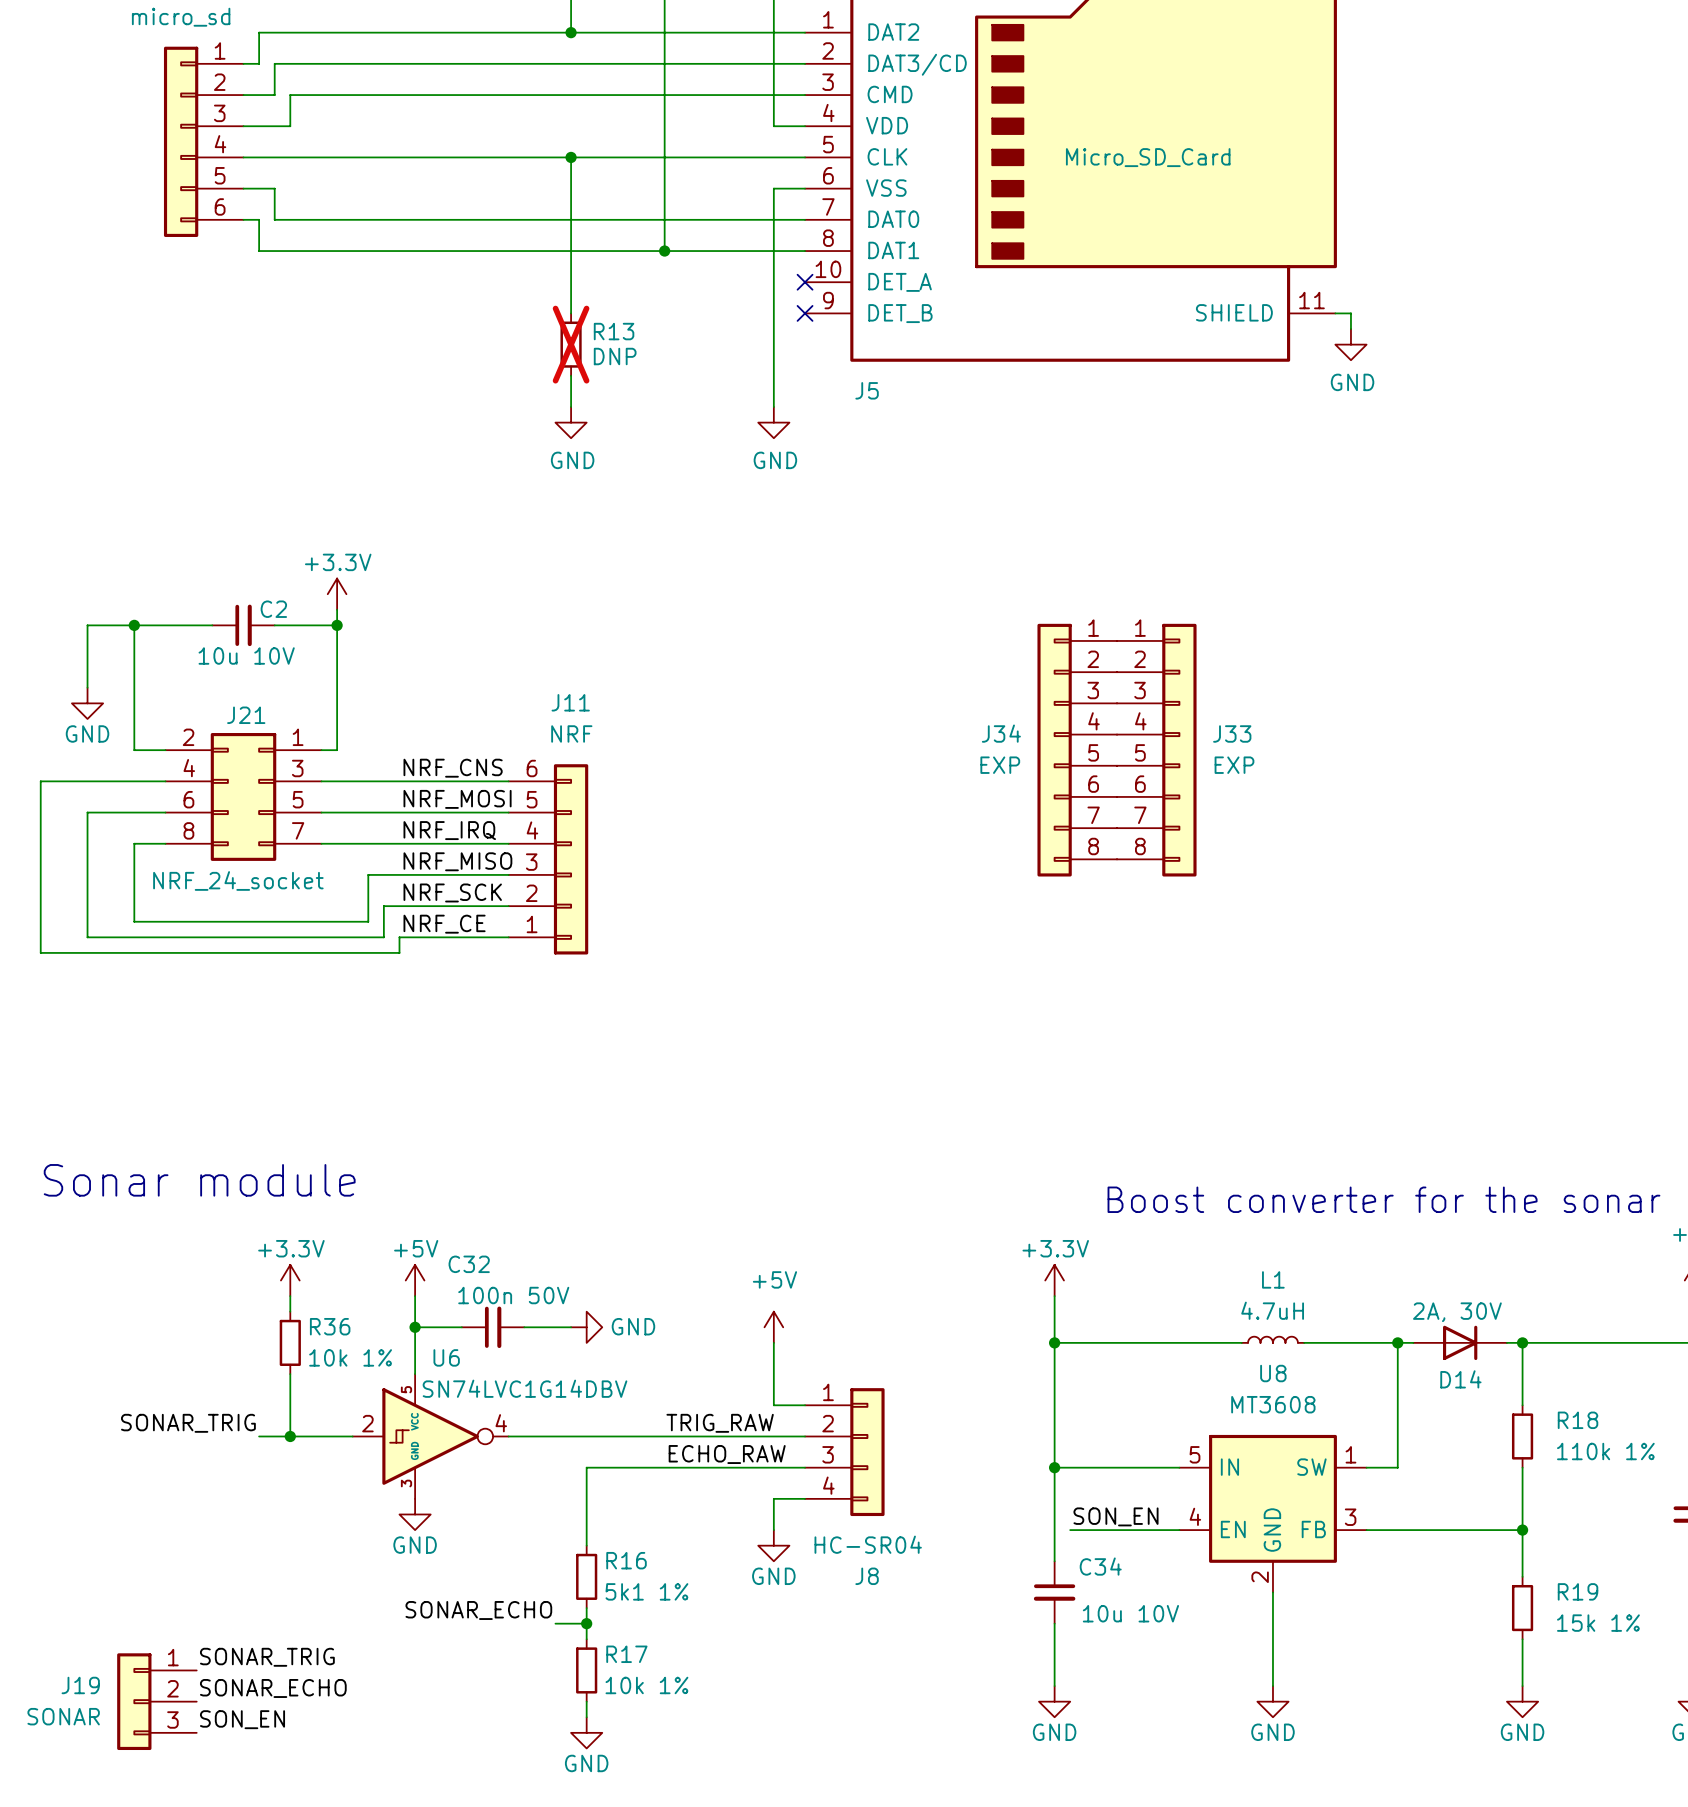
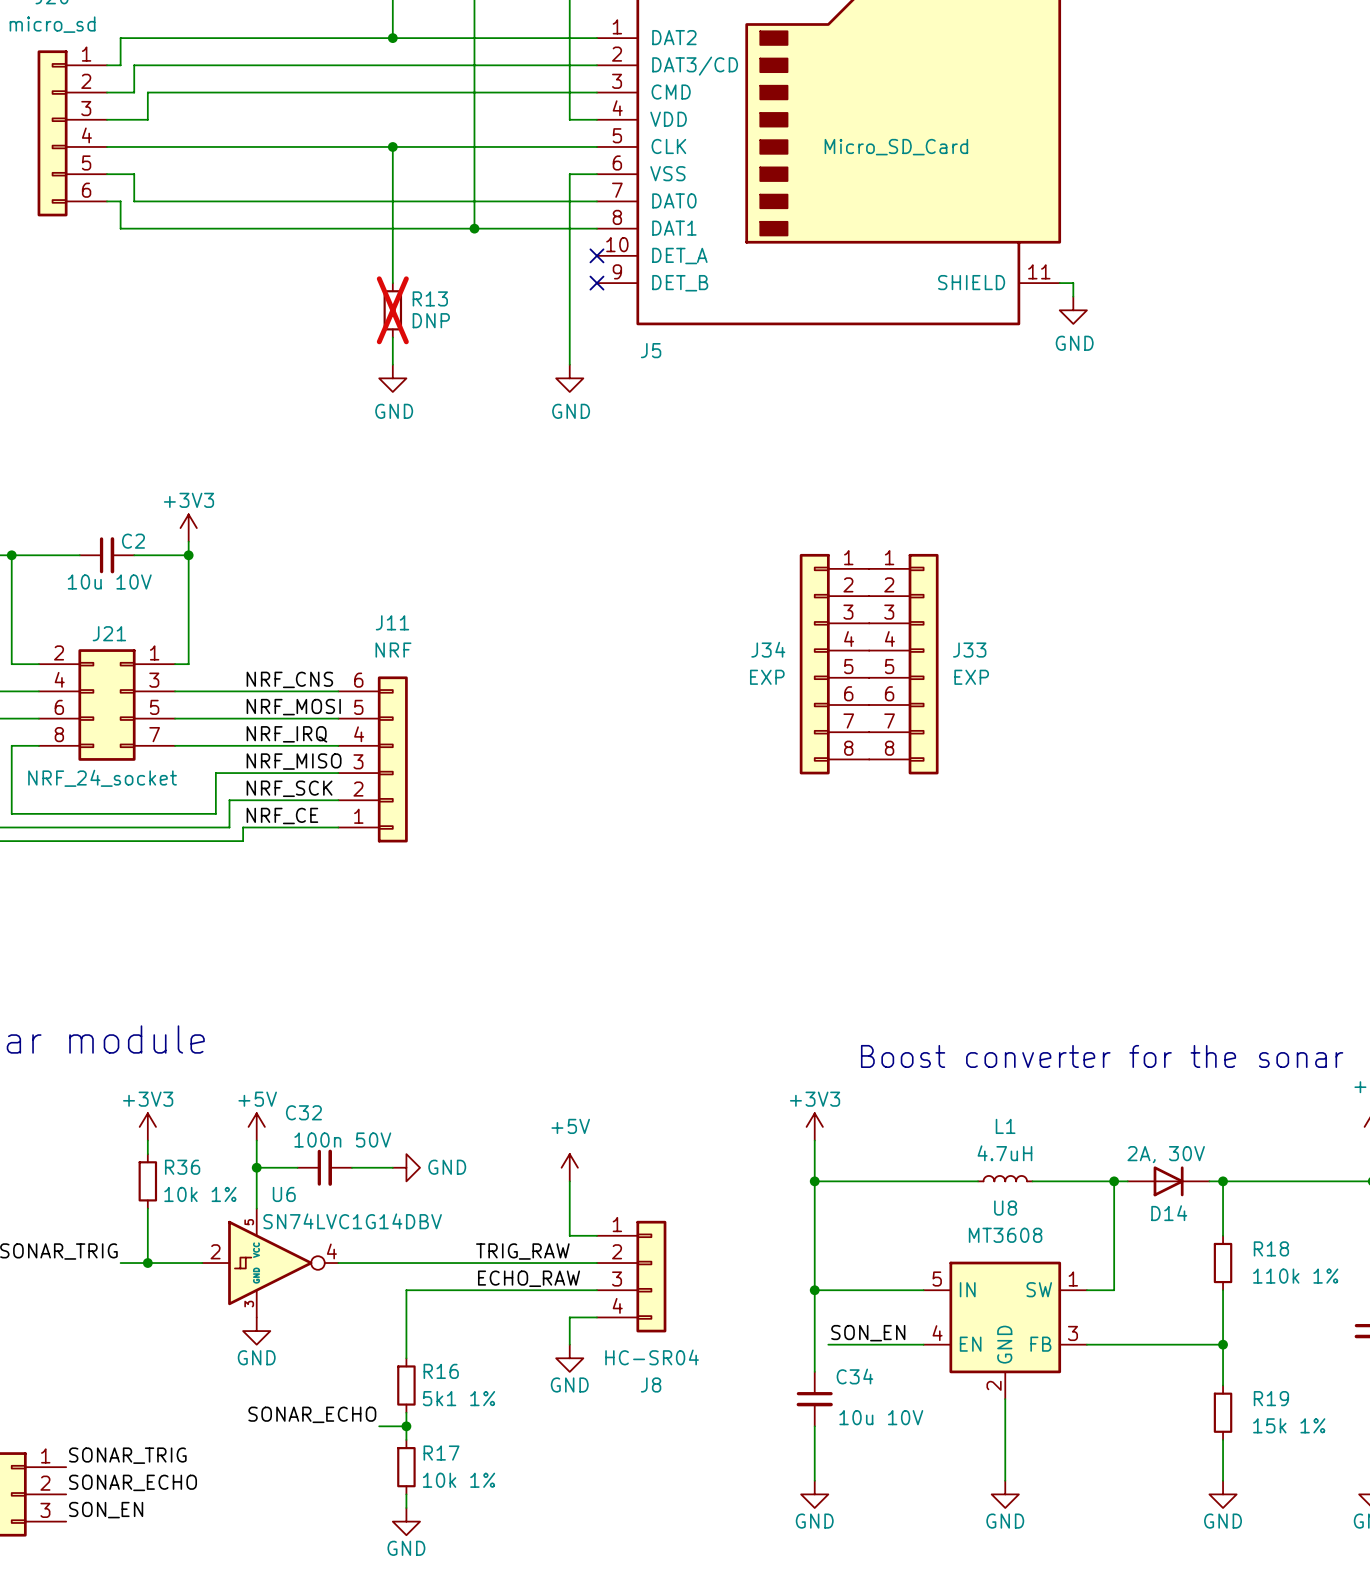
power symbol: +3.3V (337, 594) -> +3V3 (188, 528)
power symbol: +3.3V (290, 1280) -> +3V3 (147, 1126)
power symbol: +3.3V (1054, 1280) -> +3V3 (814, 1126)

